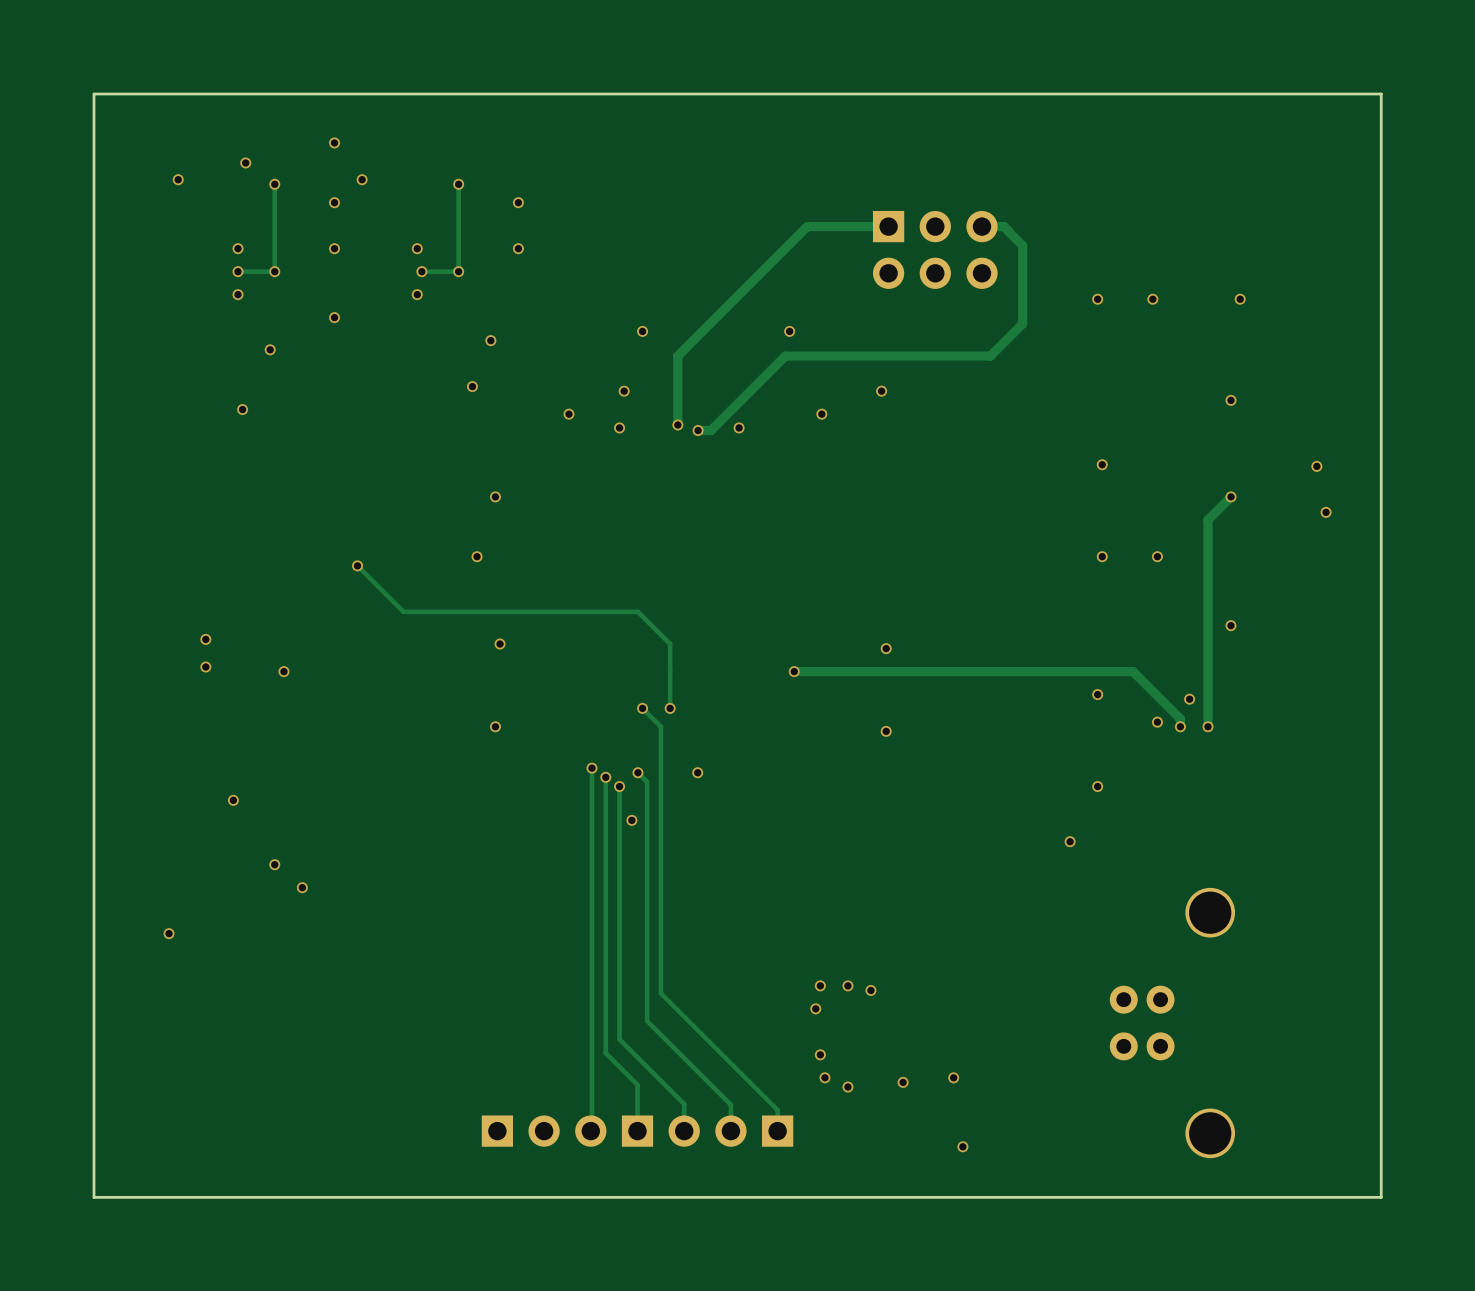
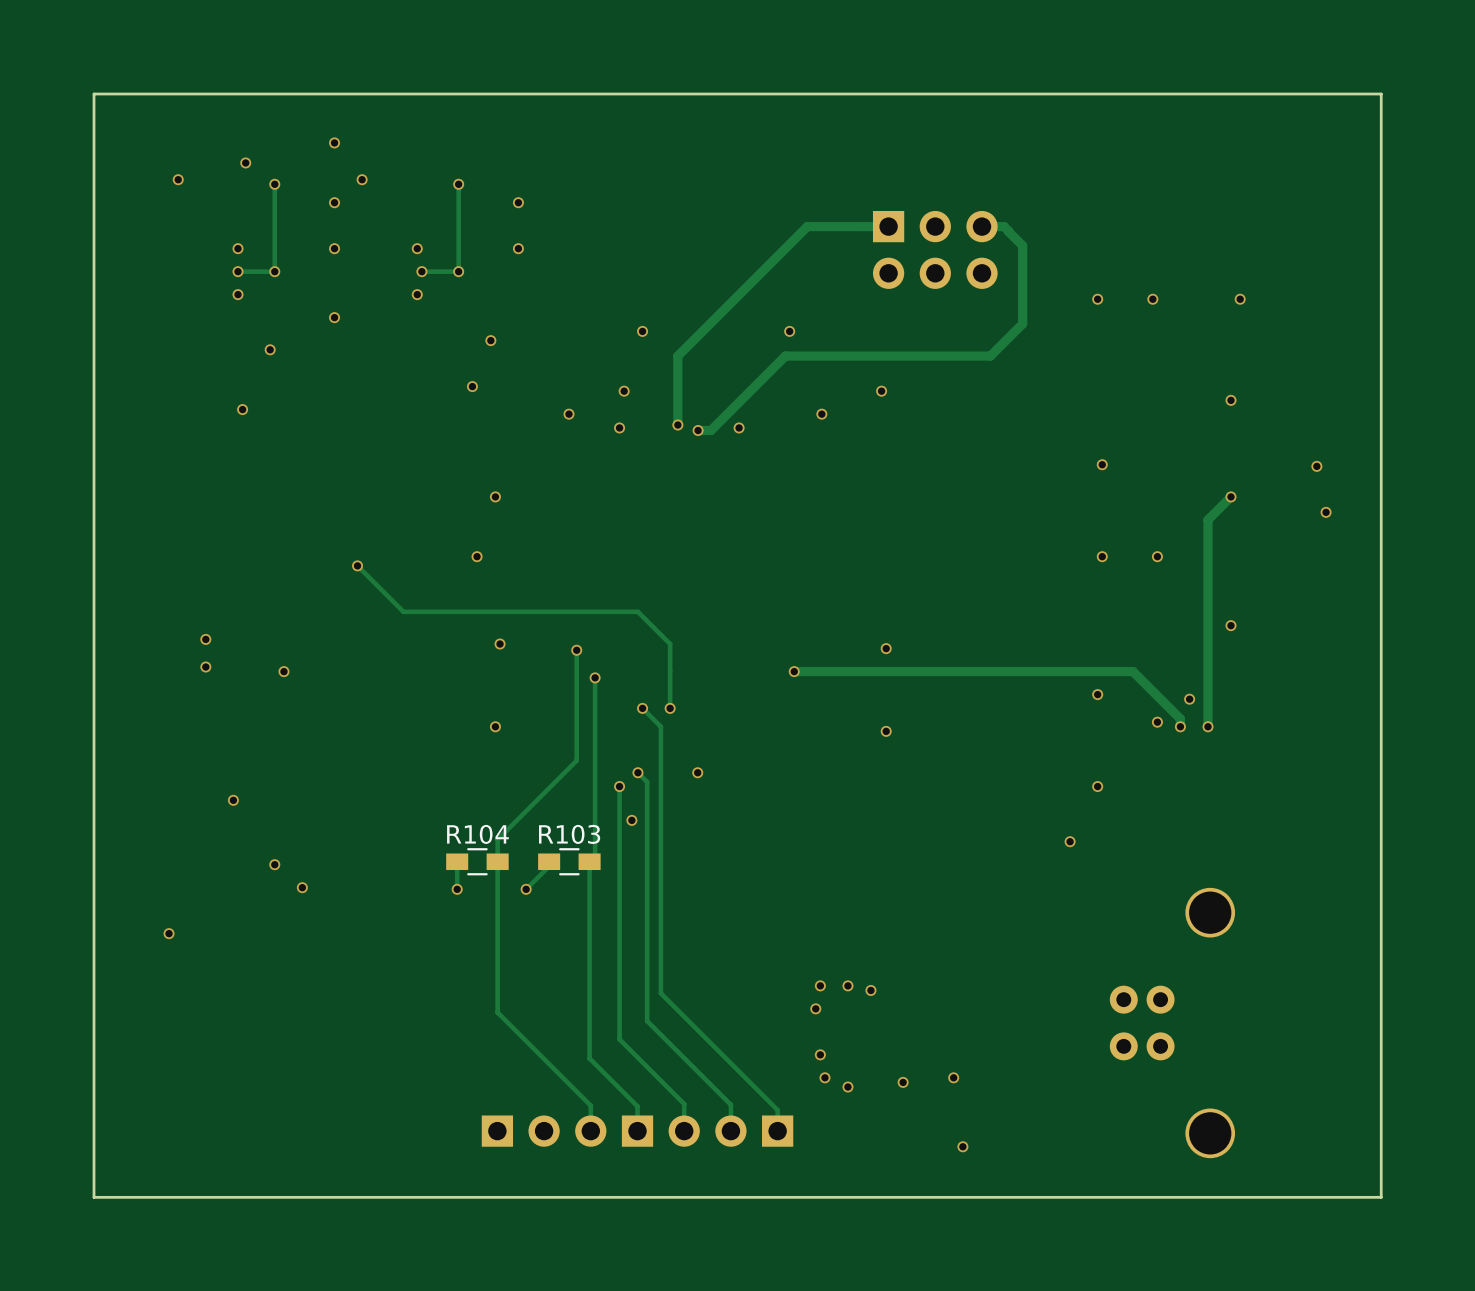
via: none -> (576, 650)
via: none -> (595, 677)
track: (591, 768) (590, 1131) -> (576, 650) (576, 760) (497, 839) (497, 1012) (590, 1105) (590, 1131)
via: (591, 768) -> none
track: (605, 777) (605, 1053) (637, 1084) (637, 1106) -> (595, 677) (595, 856) (589, 861) (589, 1058) (637, 1106)
via: (605, 777) -> none
track: none -> (457, 861) (457, 889)
R104: none -> (477, 861)
track: none -> (549, 861) (549, 866) (526, 889)
R103: none -> (569, 861)
via: none -> (457, 889)
via: none -> (526, 889)

